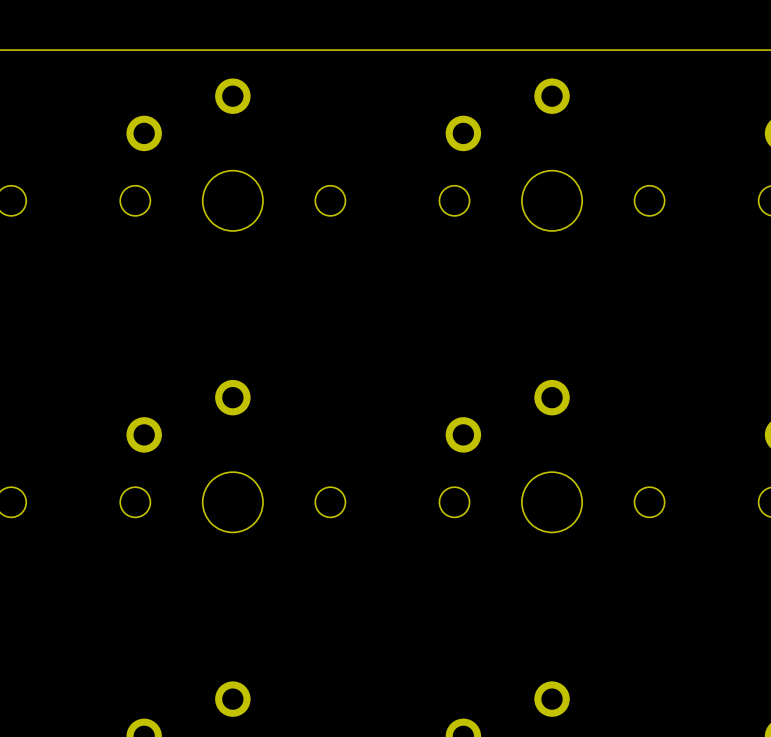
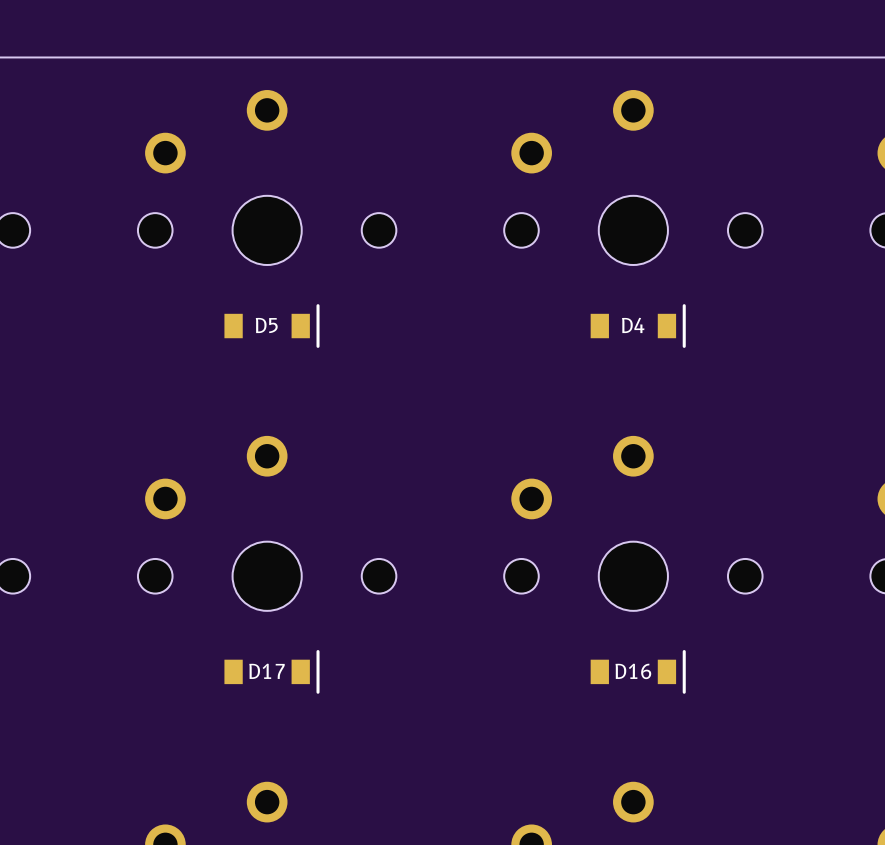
D5: none -> (271, 326)
D4: none -> (638, 326)
D17: none -> (271, 671)
D16: none -> (638, 671)

